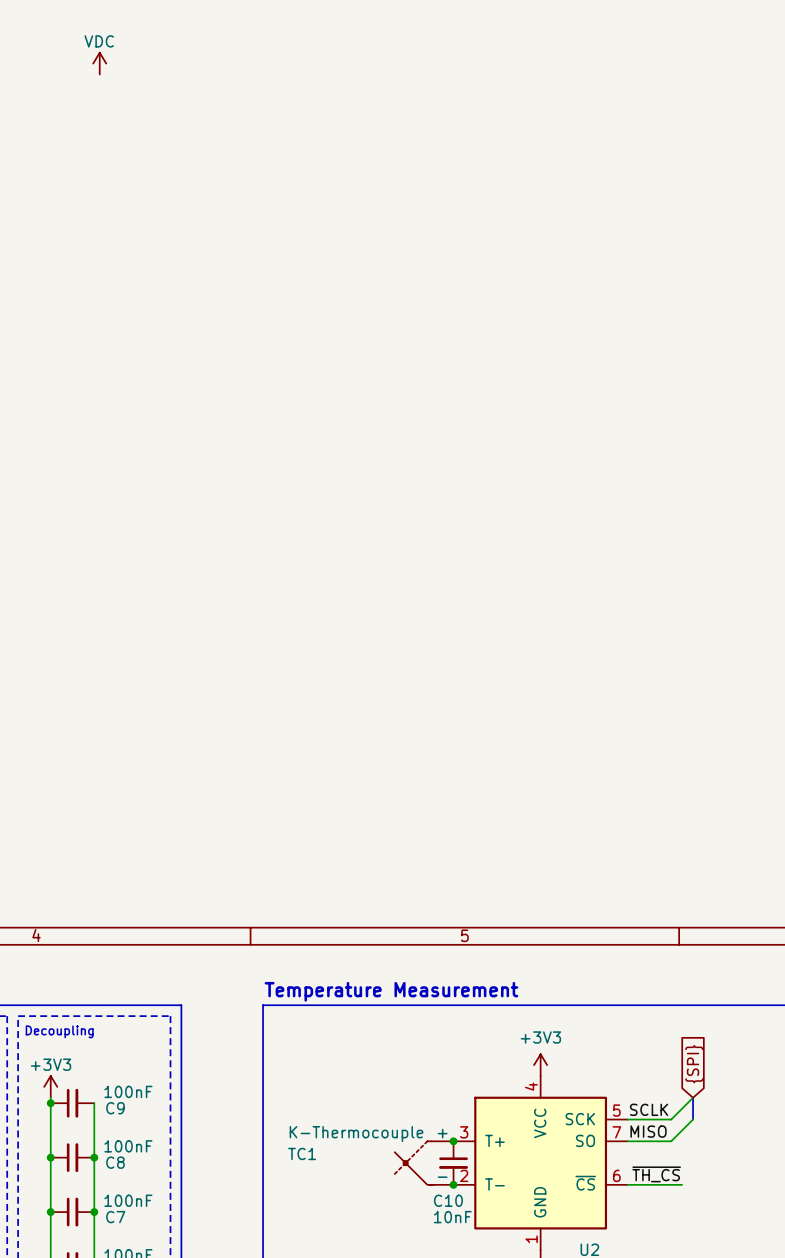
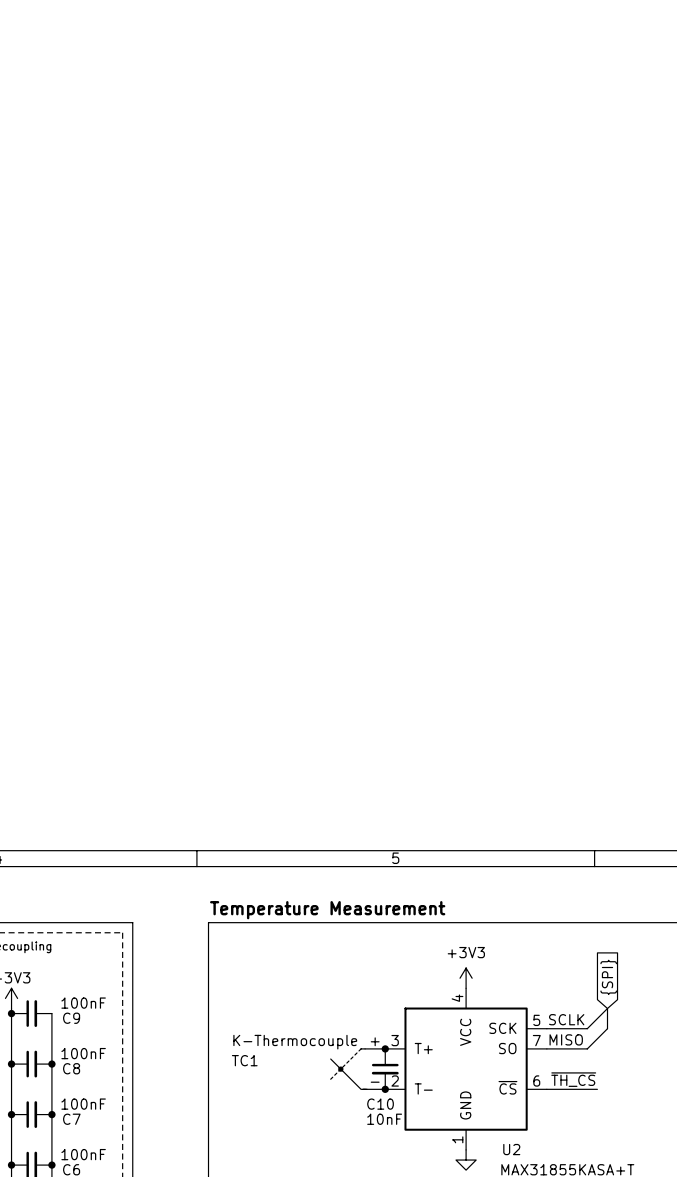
power symbol: VDC (99, 63) -> none

